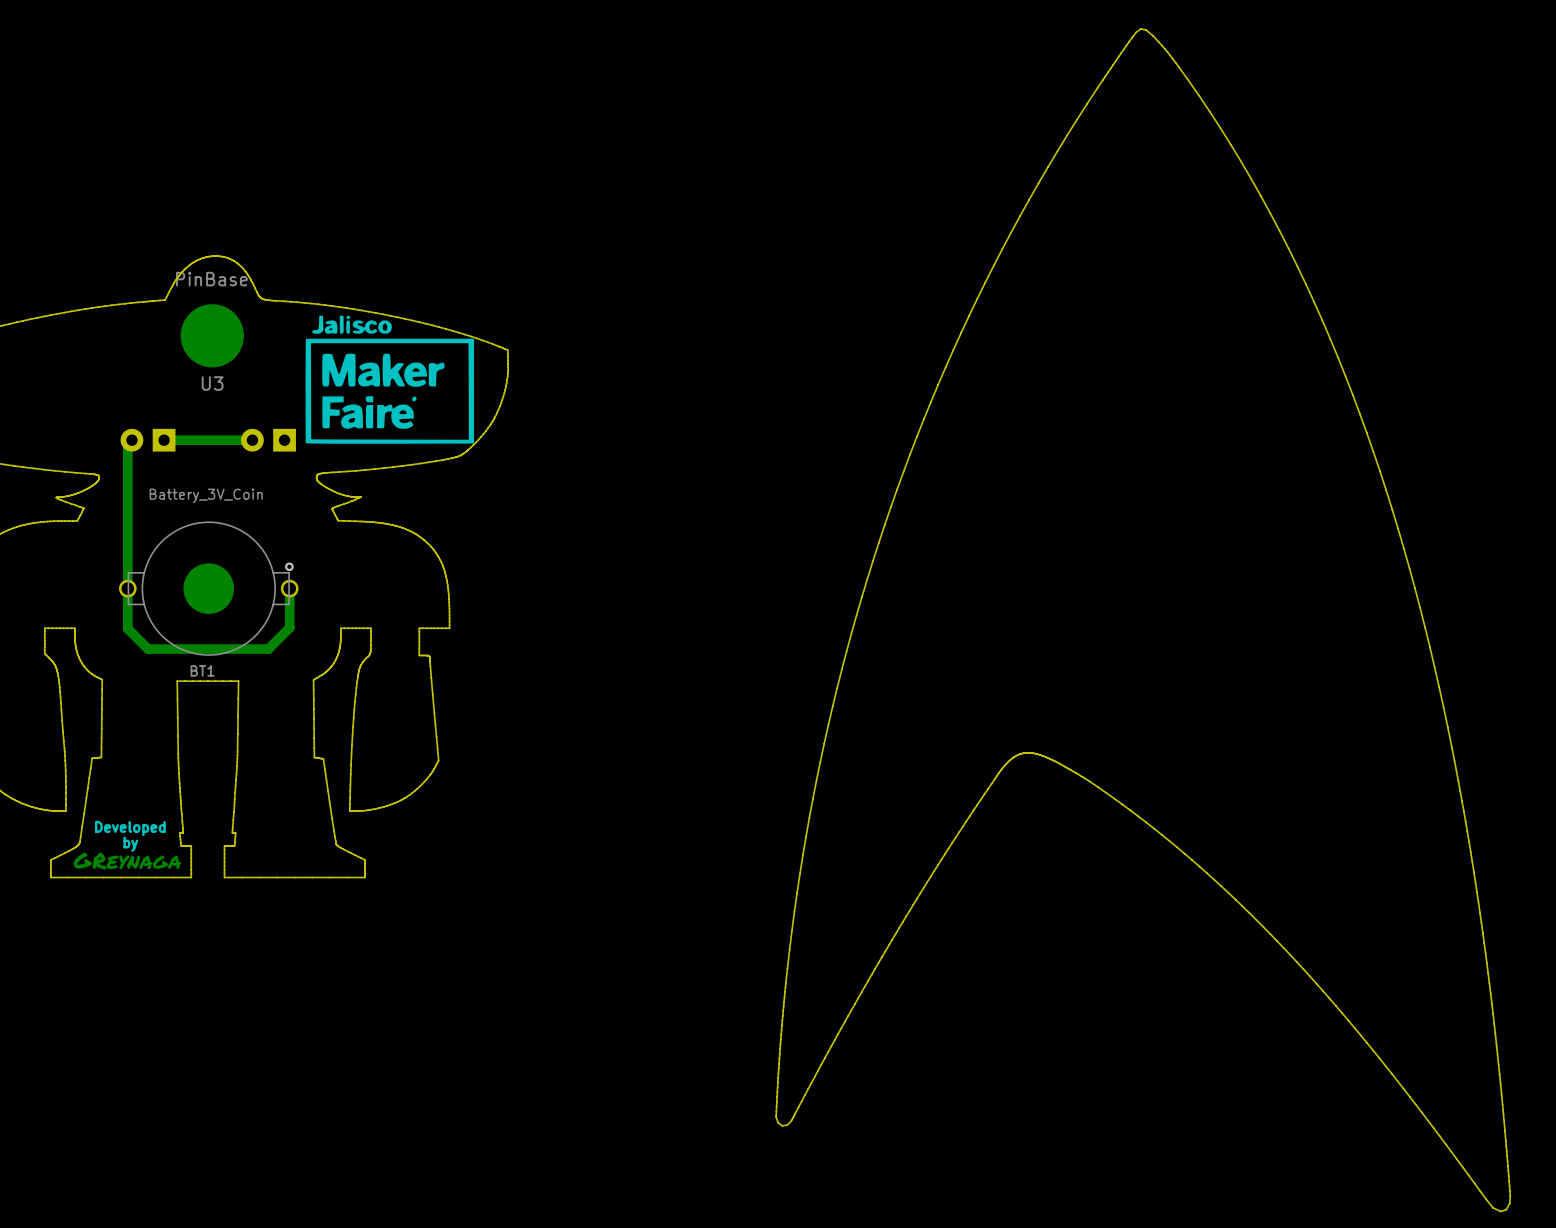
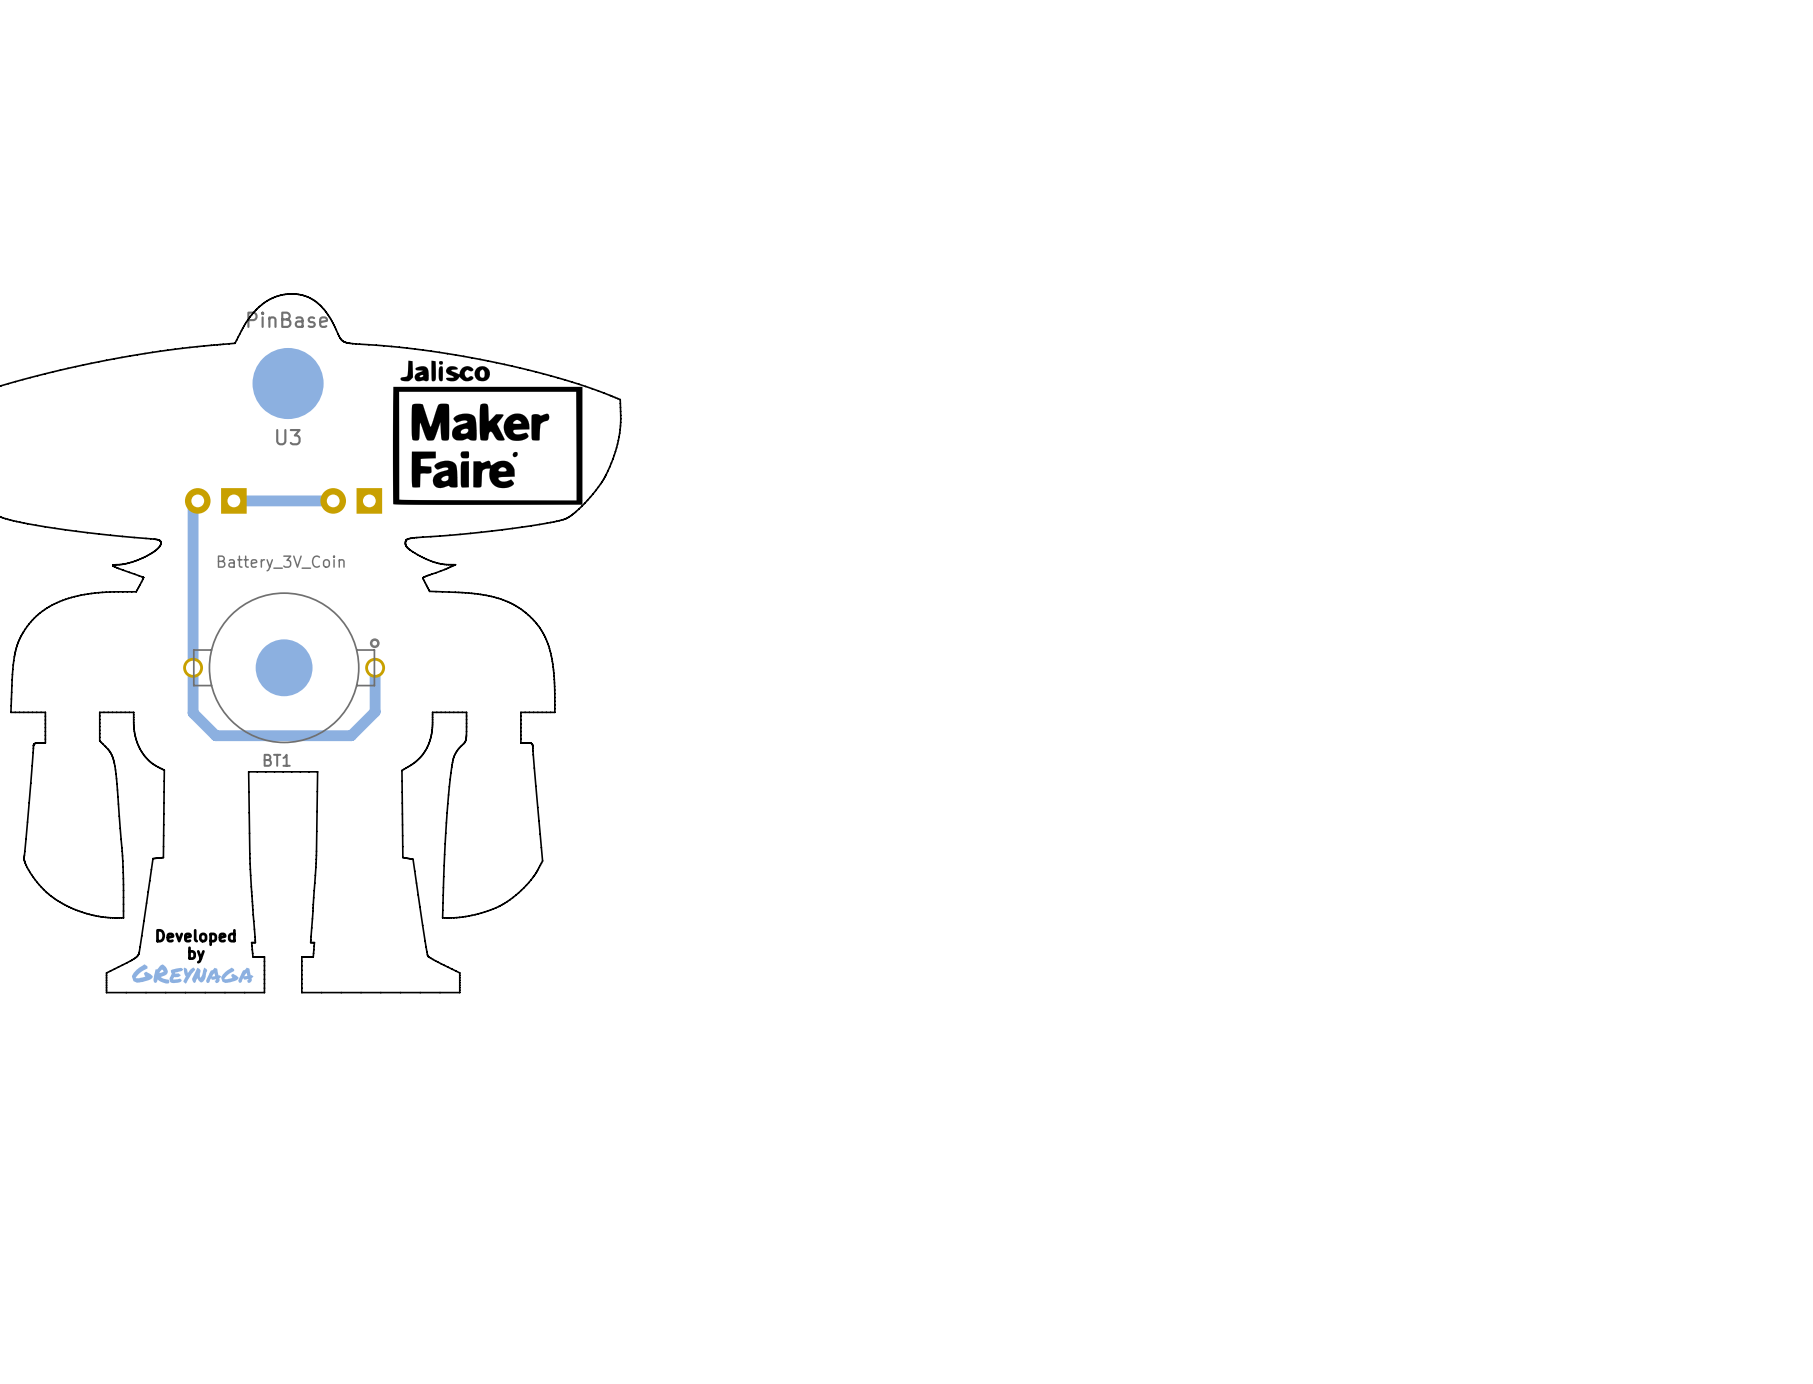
drawing: [775, 28, 1511, 1213] -> none

